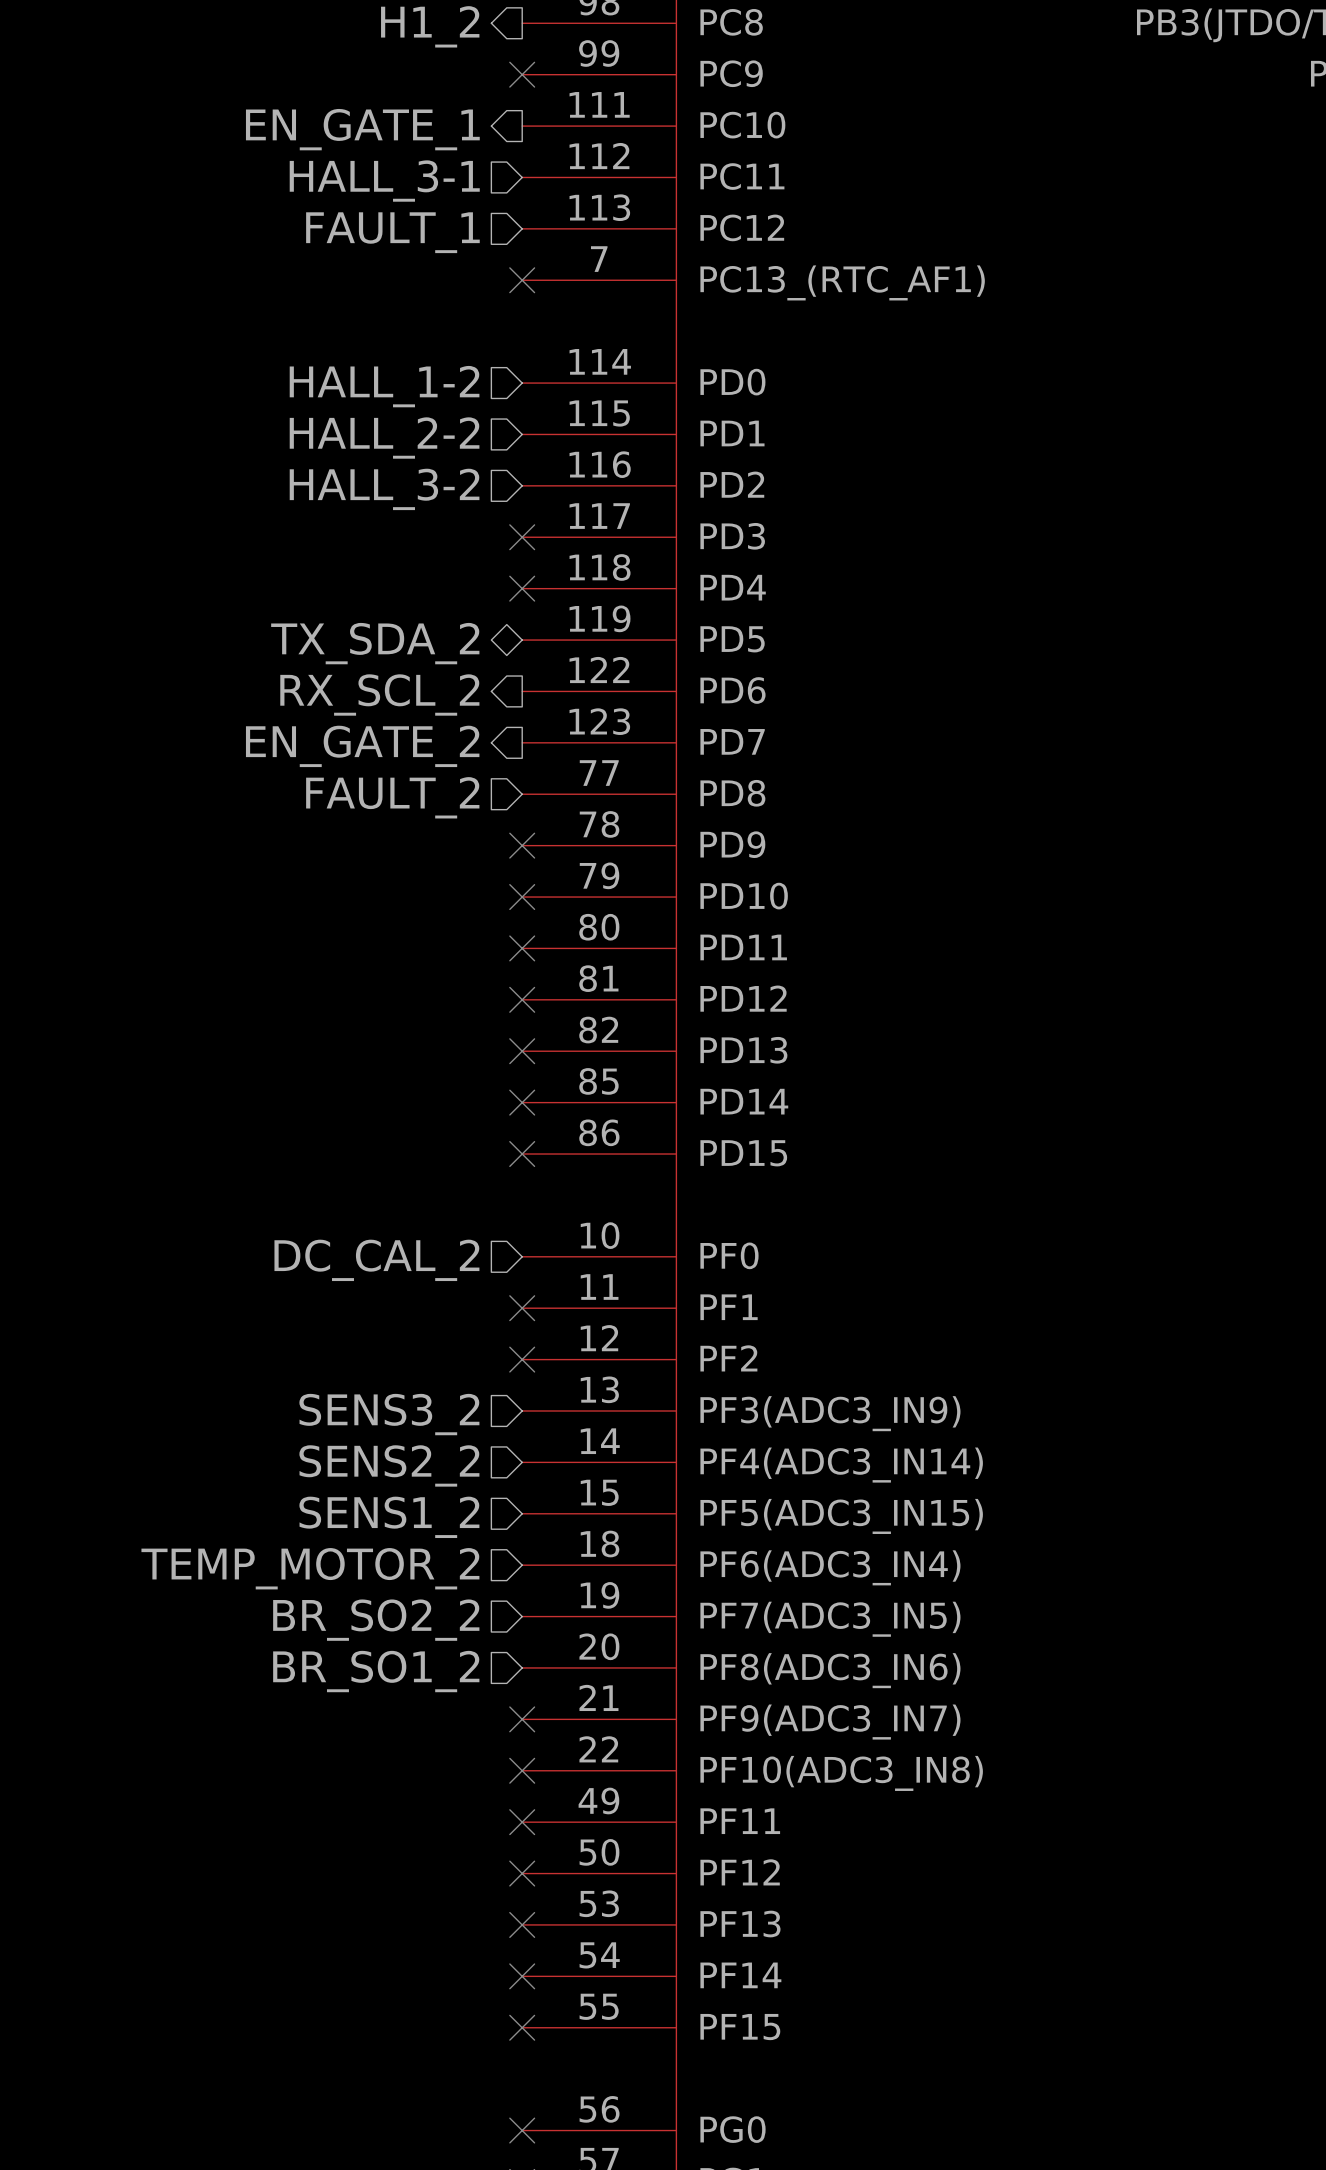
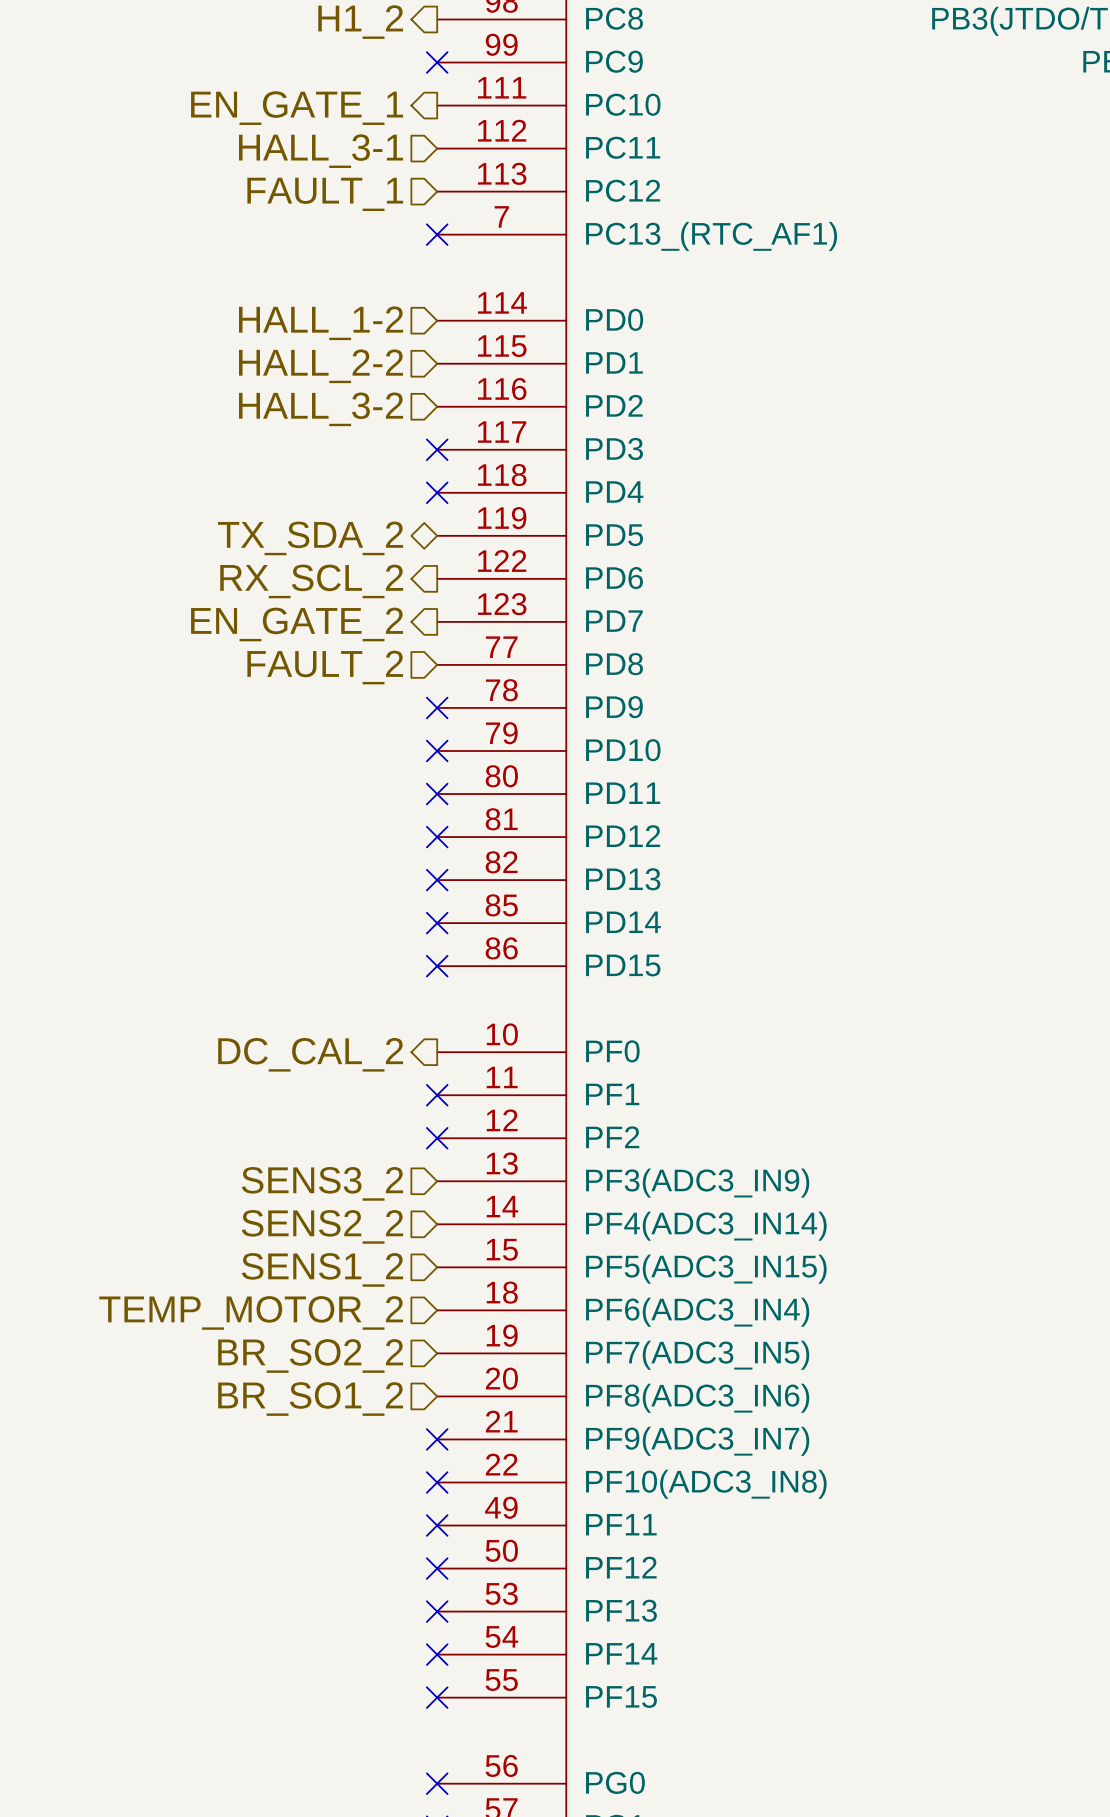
hierarchical label shape: input (376, 1260) -> output (310, 1054)

